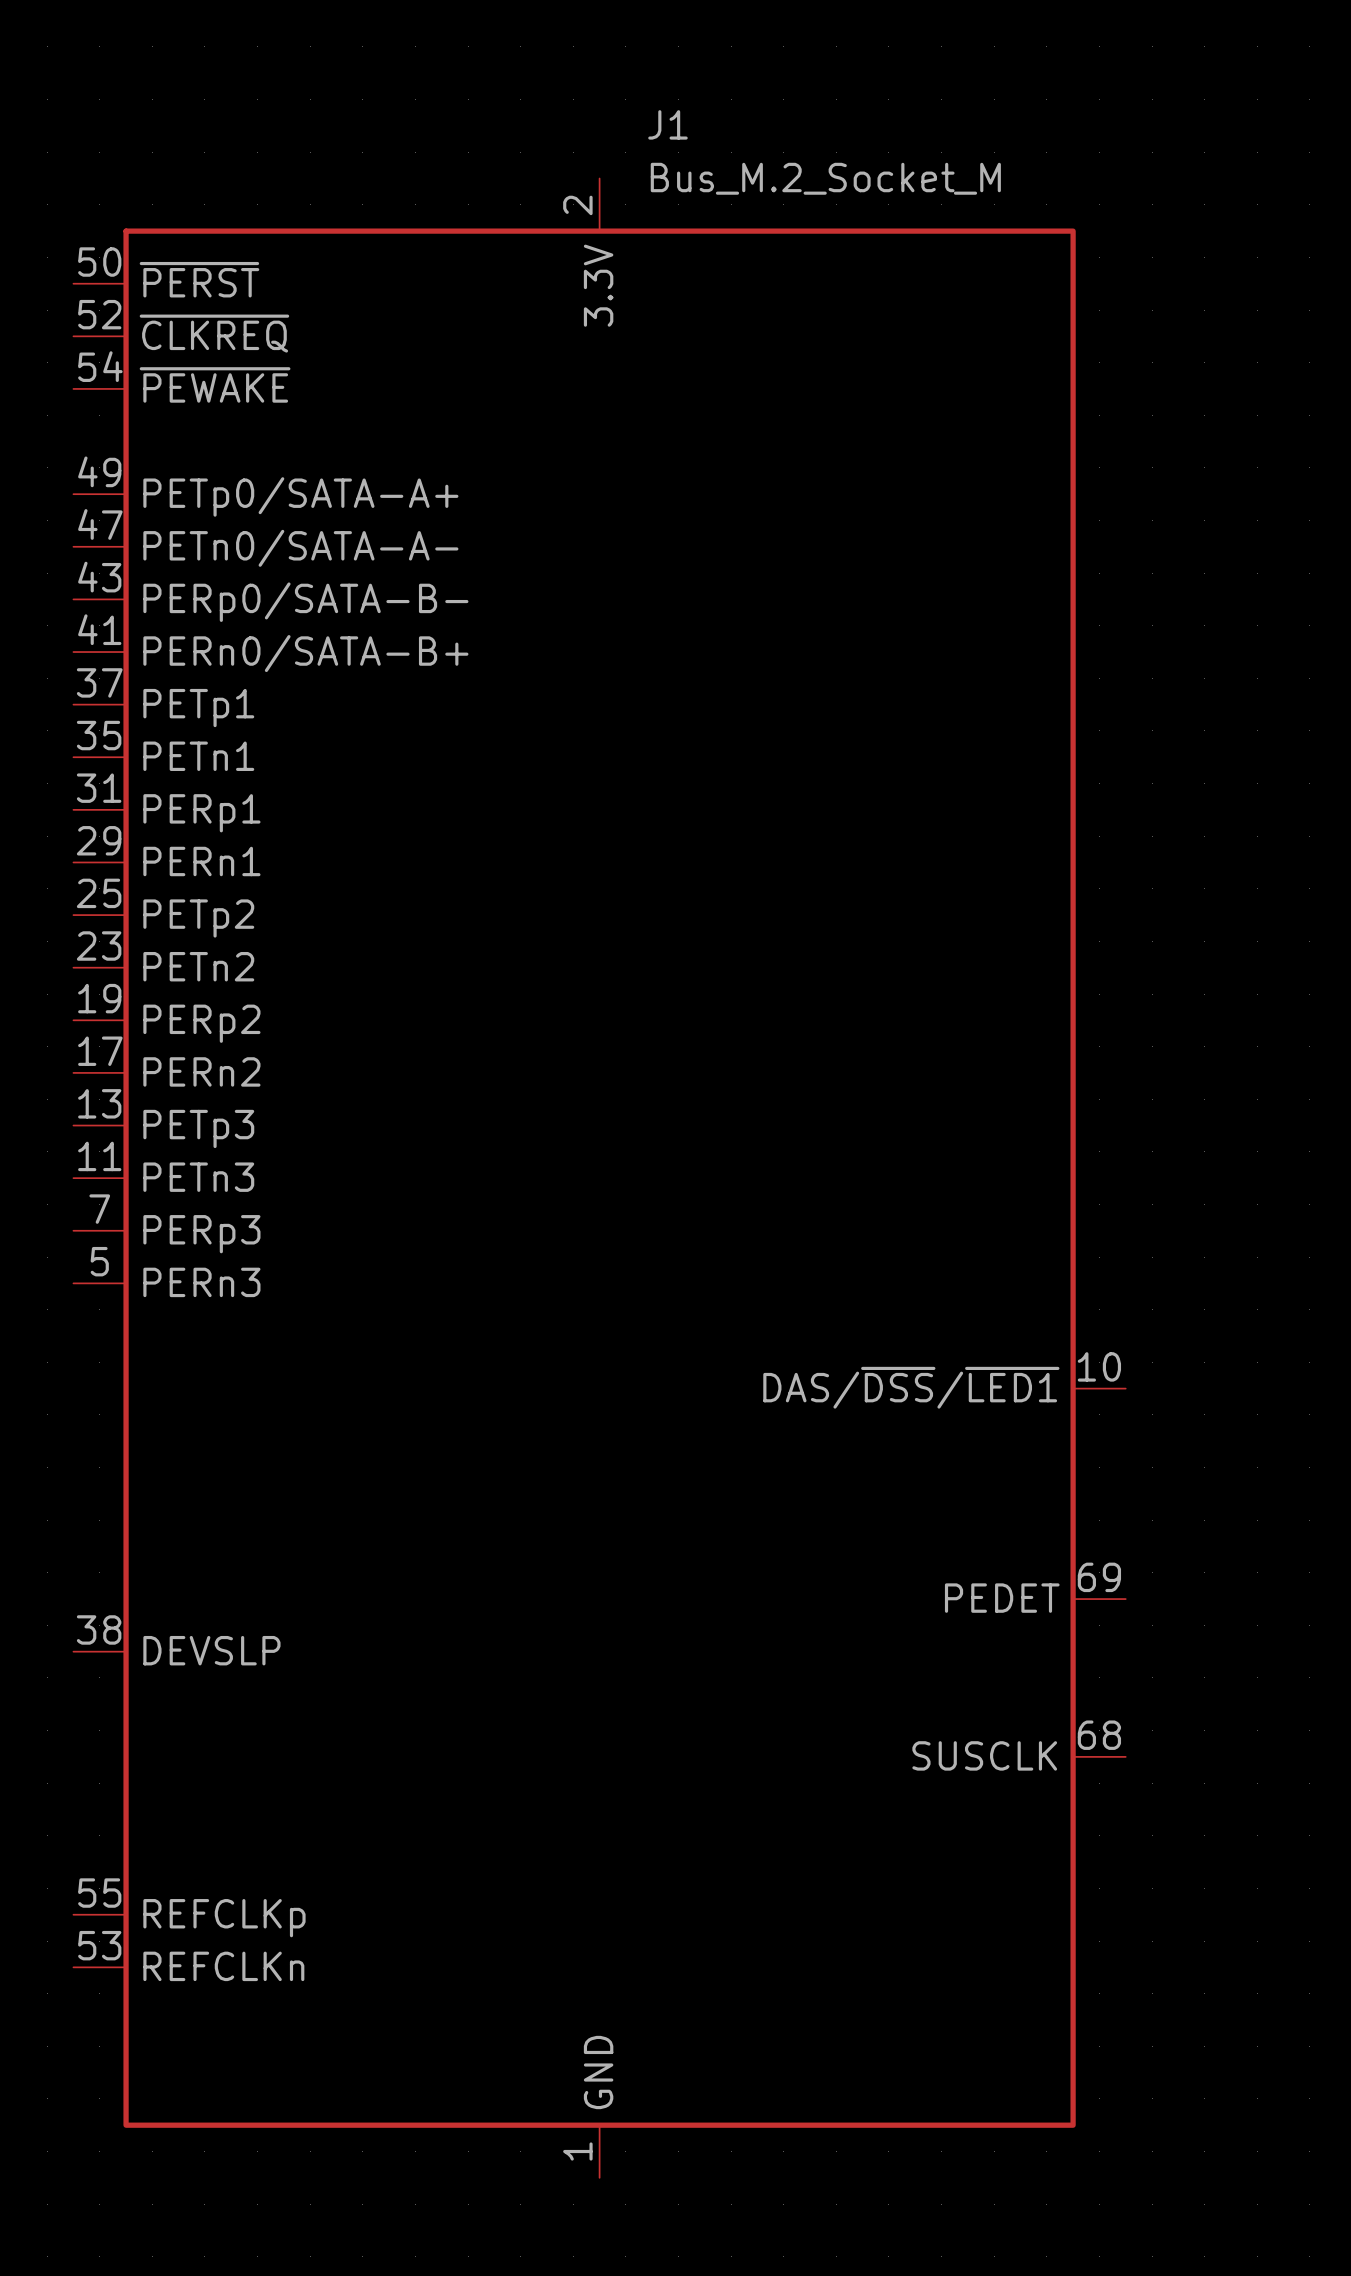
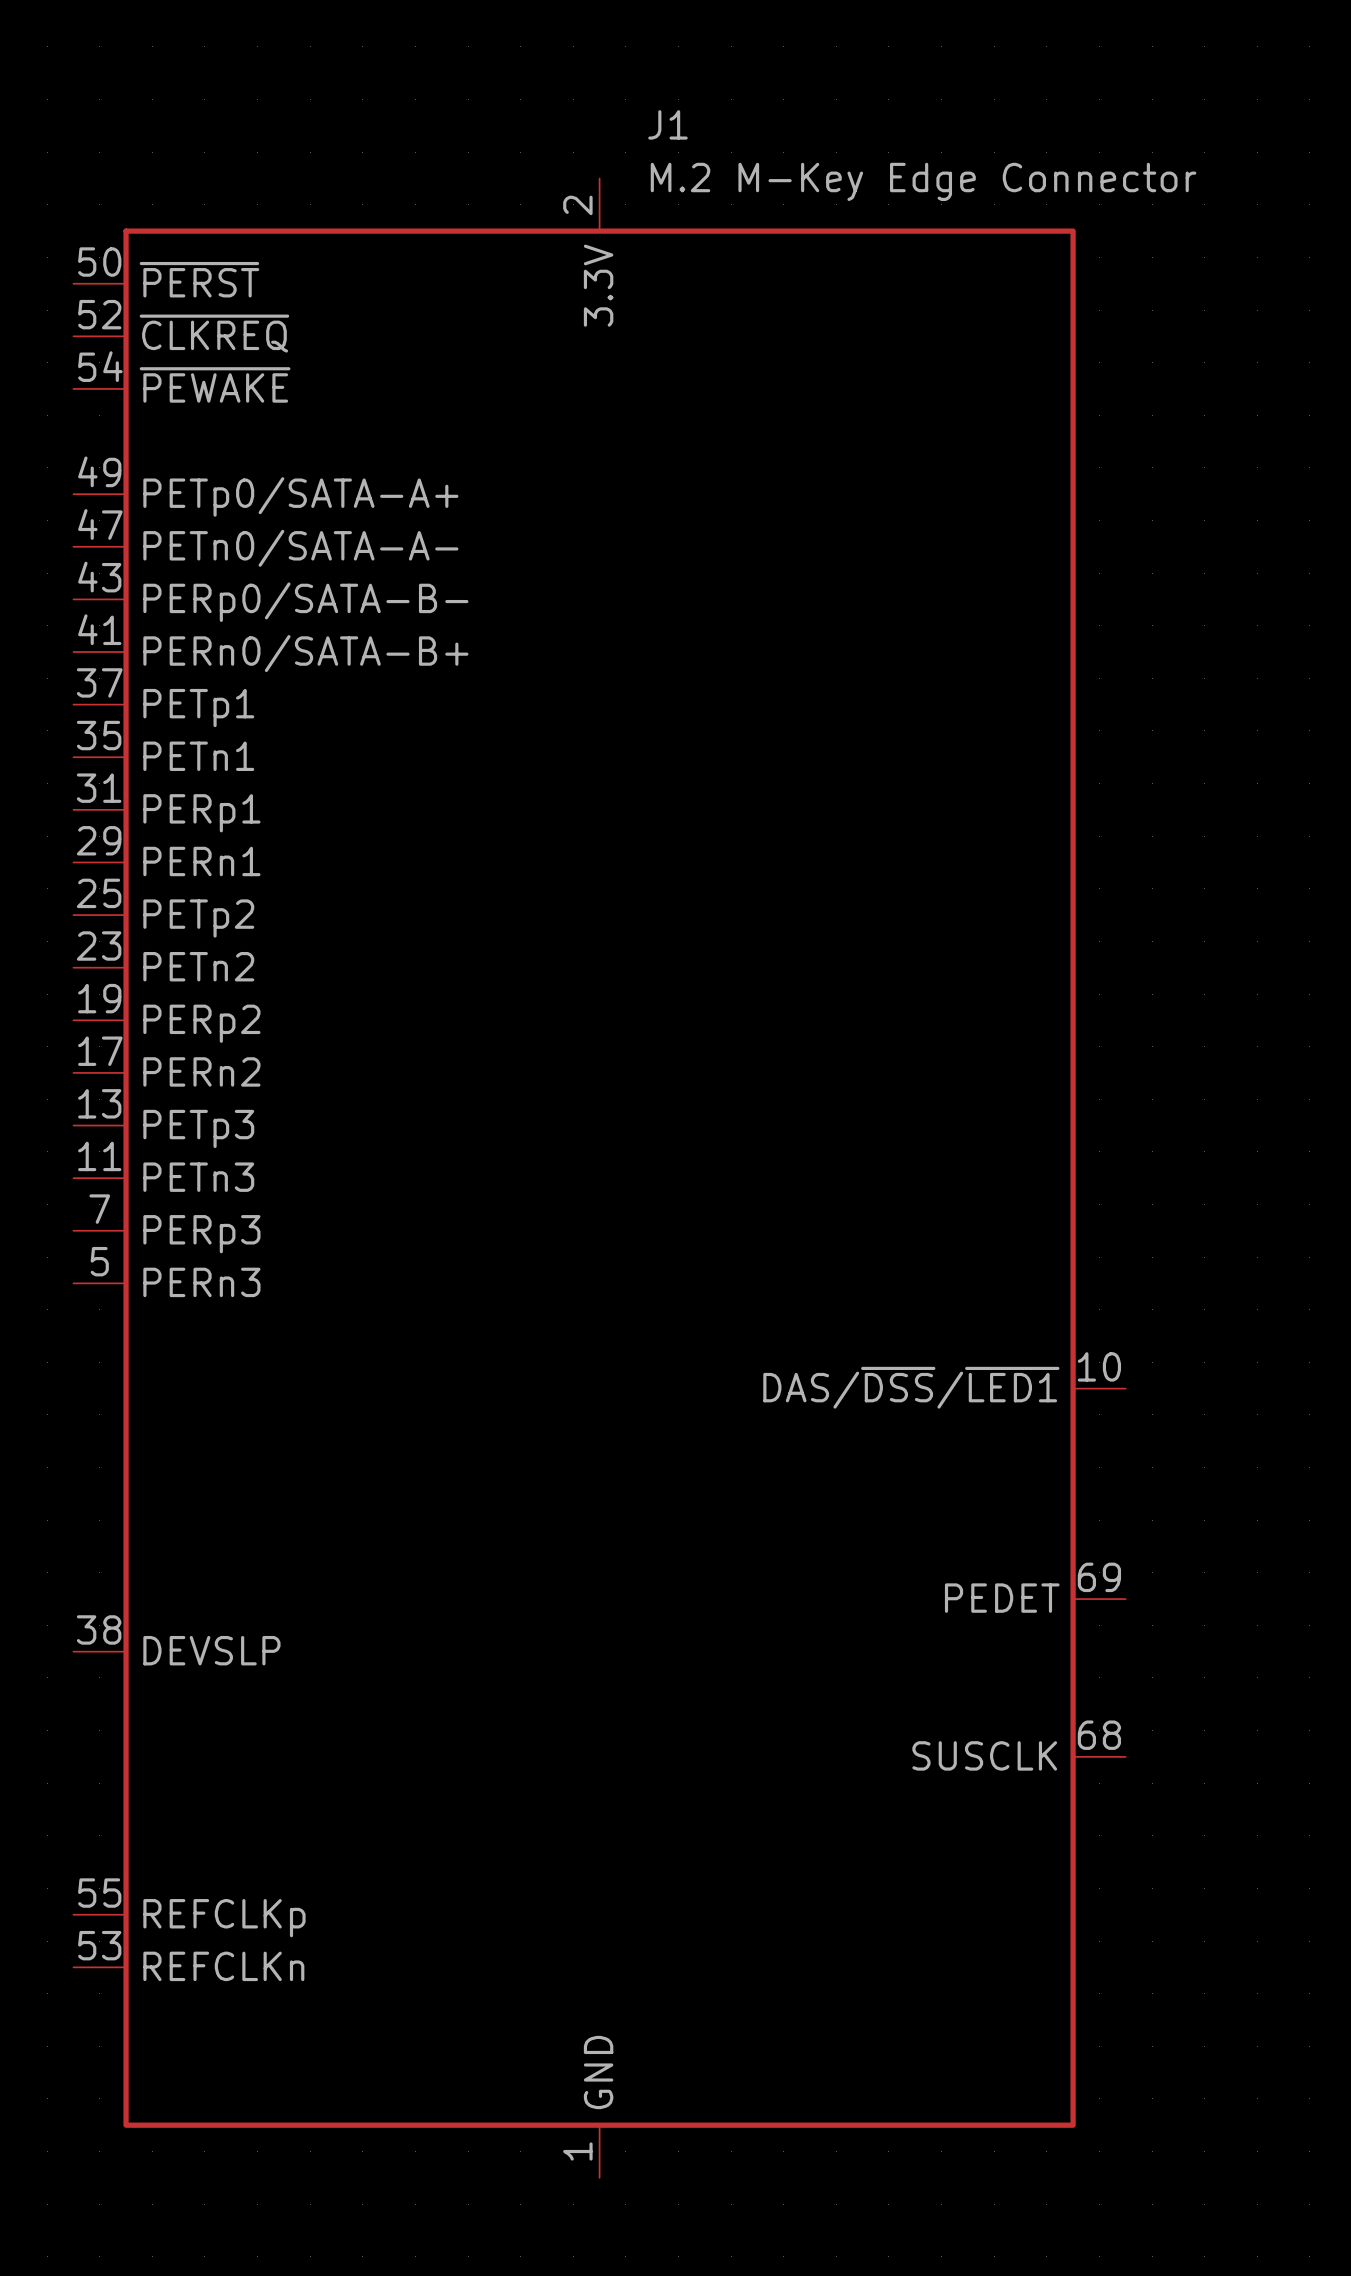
J1 value: Bus_M.2_Socket_M (825, 178) -> M.2 M-Key Edge Connector (923, 181)

